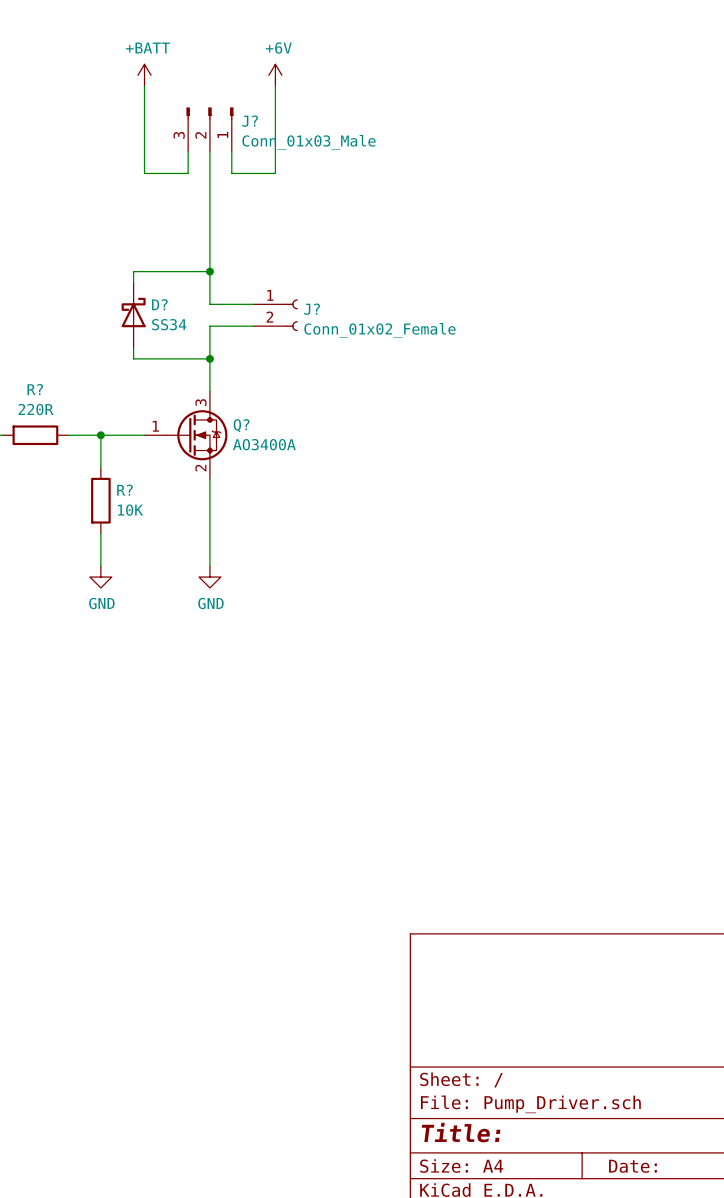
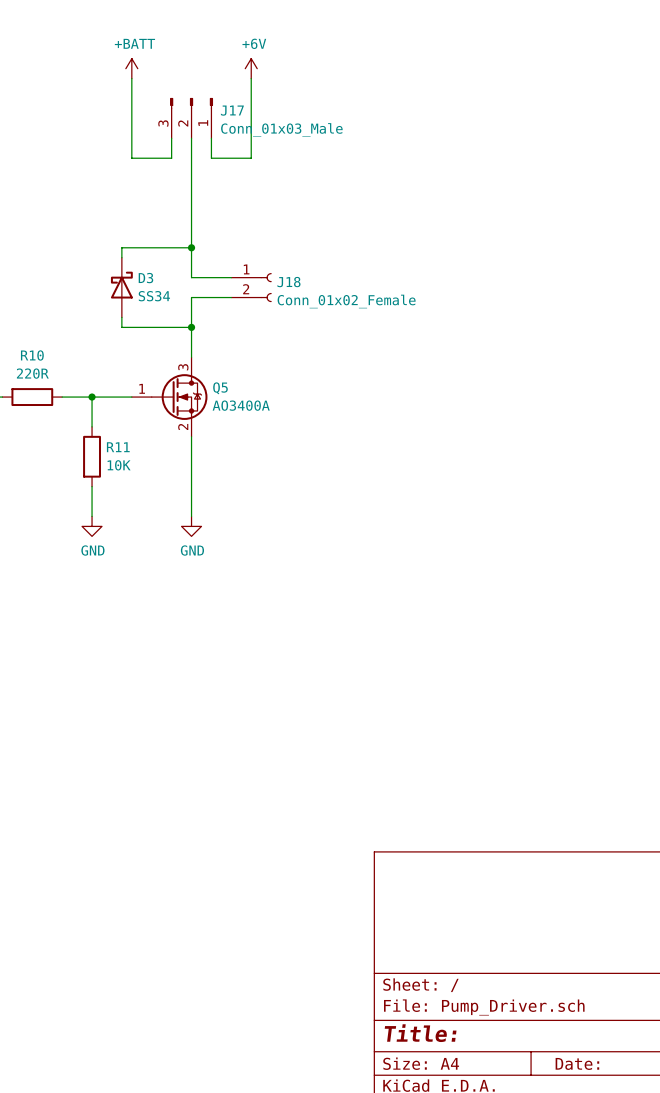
J? name: J? (250, 121) -> J17 (232, 110)
D? name: D? (159, 304) -> D3 (145, 278)
J? name: J? (312, 309) -> J18 (288, 282)
R? name: R? (35, 389) -> R10 (32, 355)
Q? name: Q? (241, 425) -> Q5 (220, 388)
R? name: R? (124, 490) -> R11 (118, 447)

